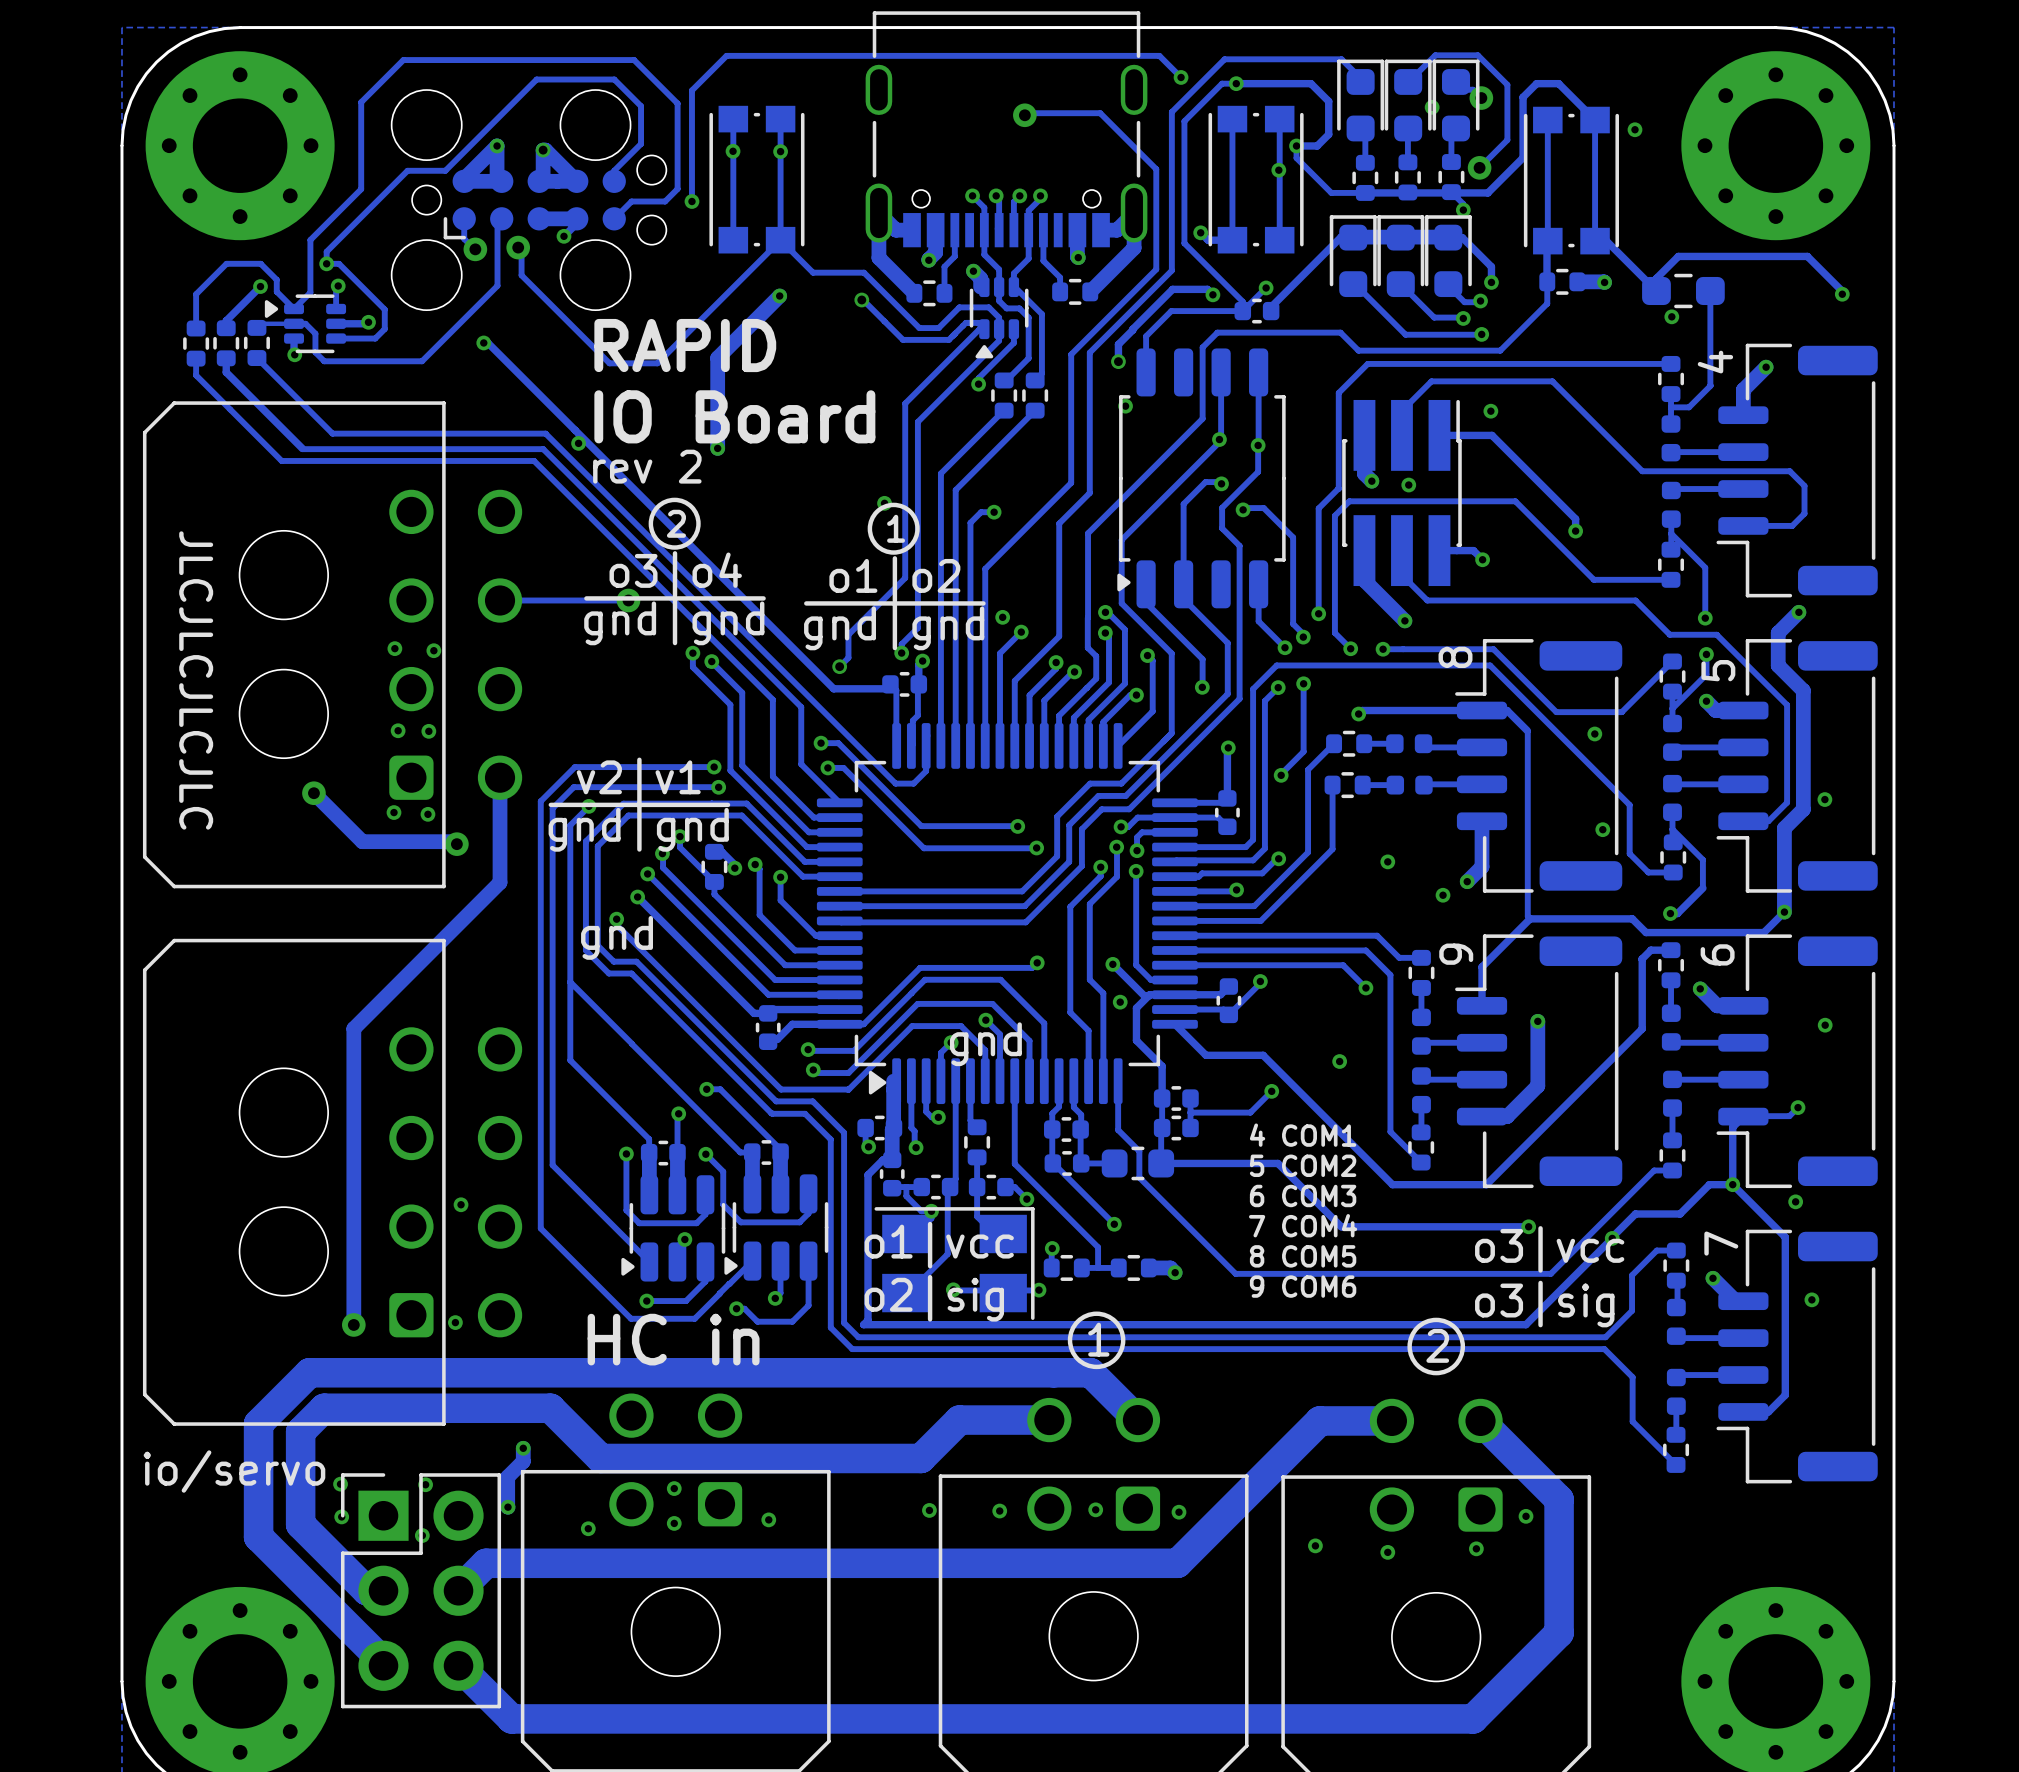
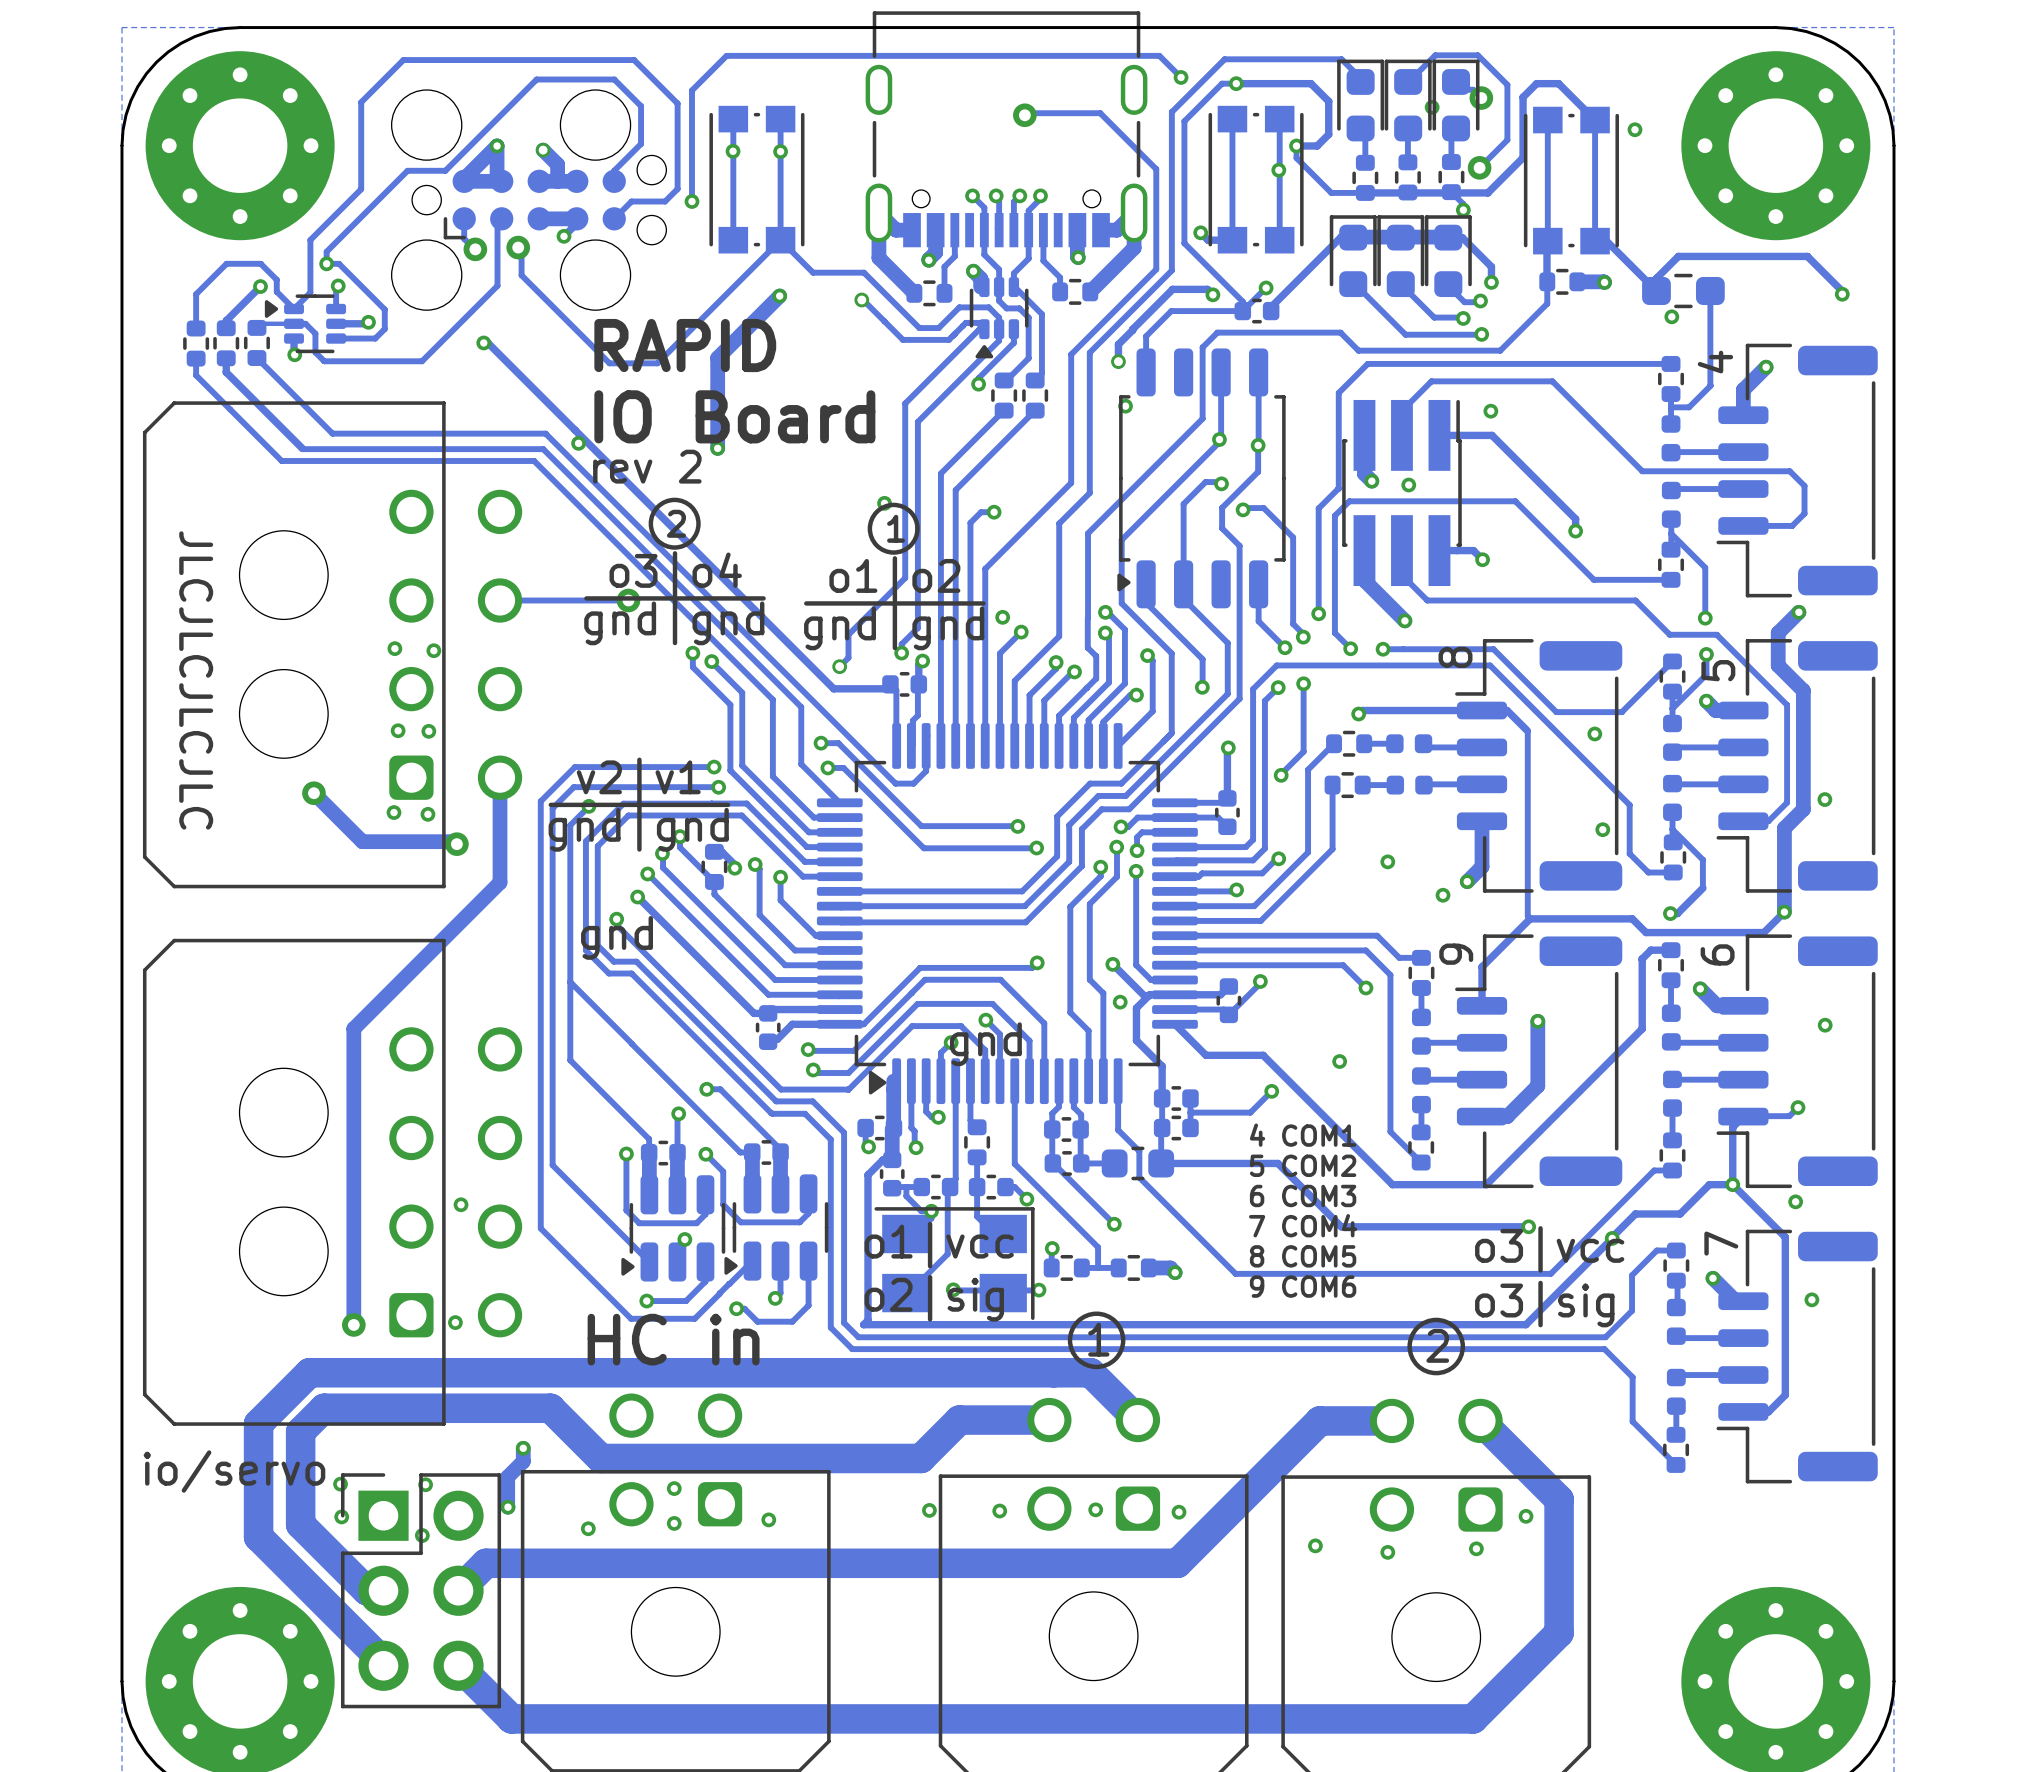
track: none -> (543, 150) (557, 164) (557, 181)
track: (576, 181) (545, 150) (543, 150) (543, 177) (539, 181) -> none

